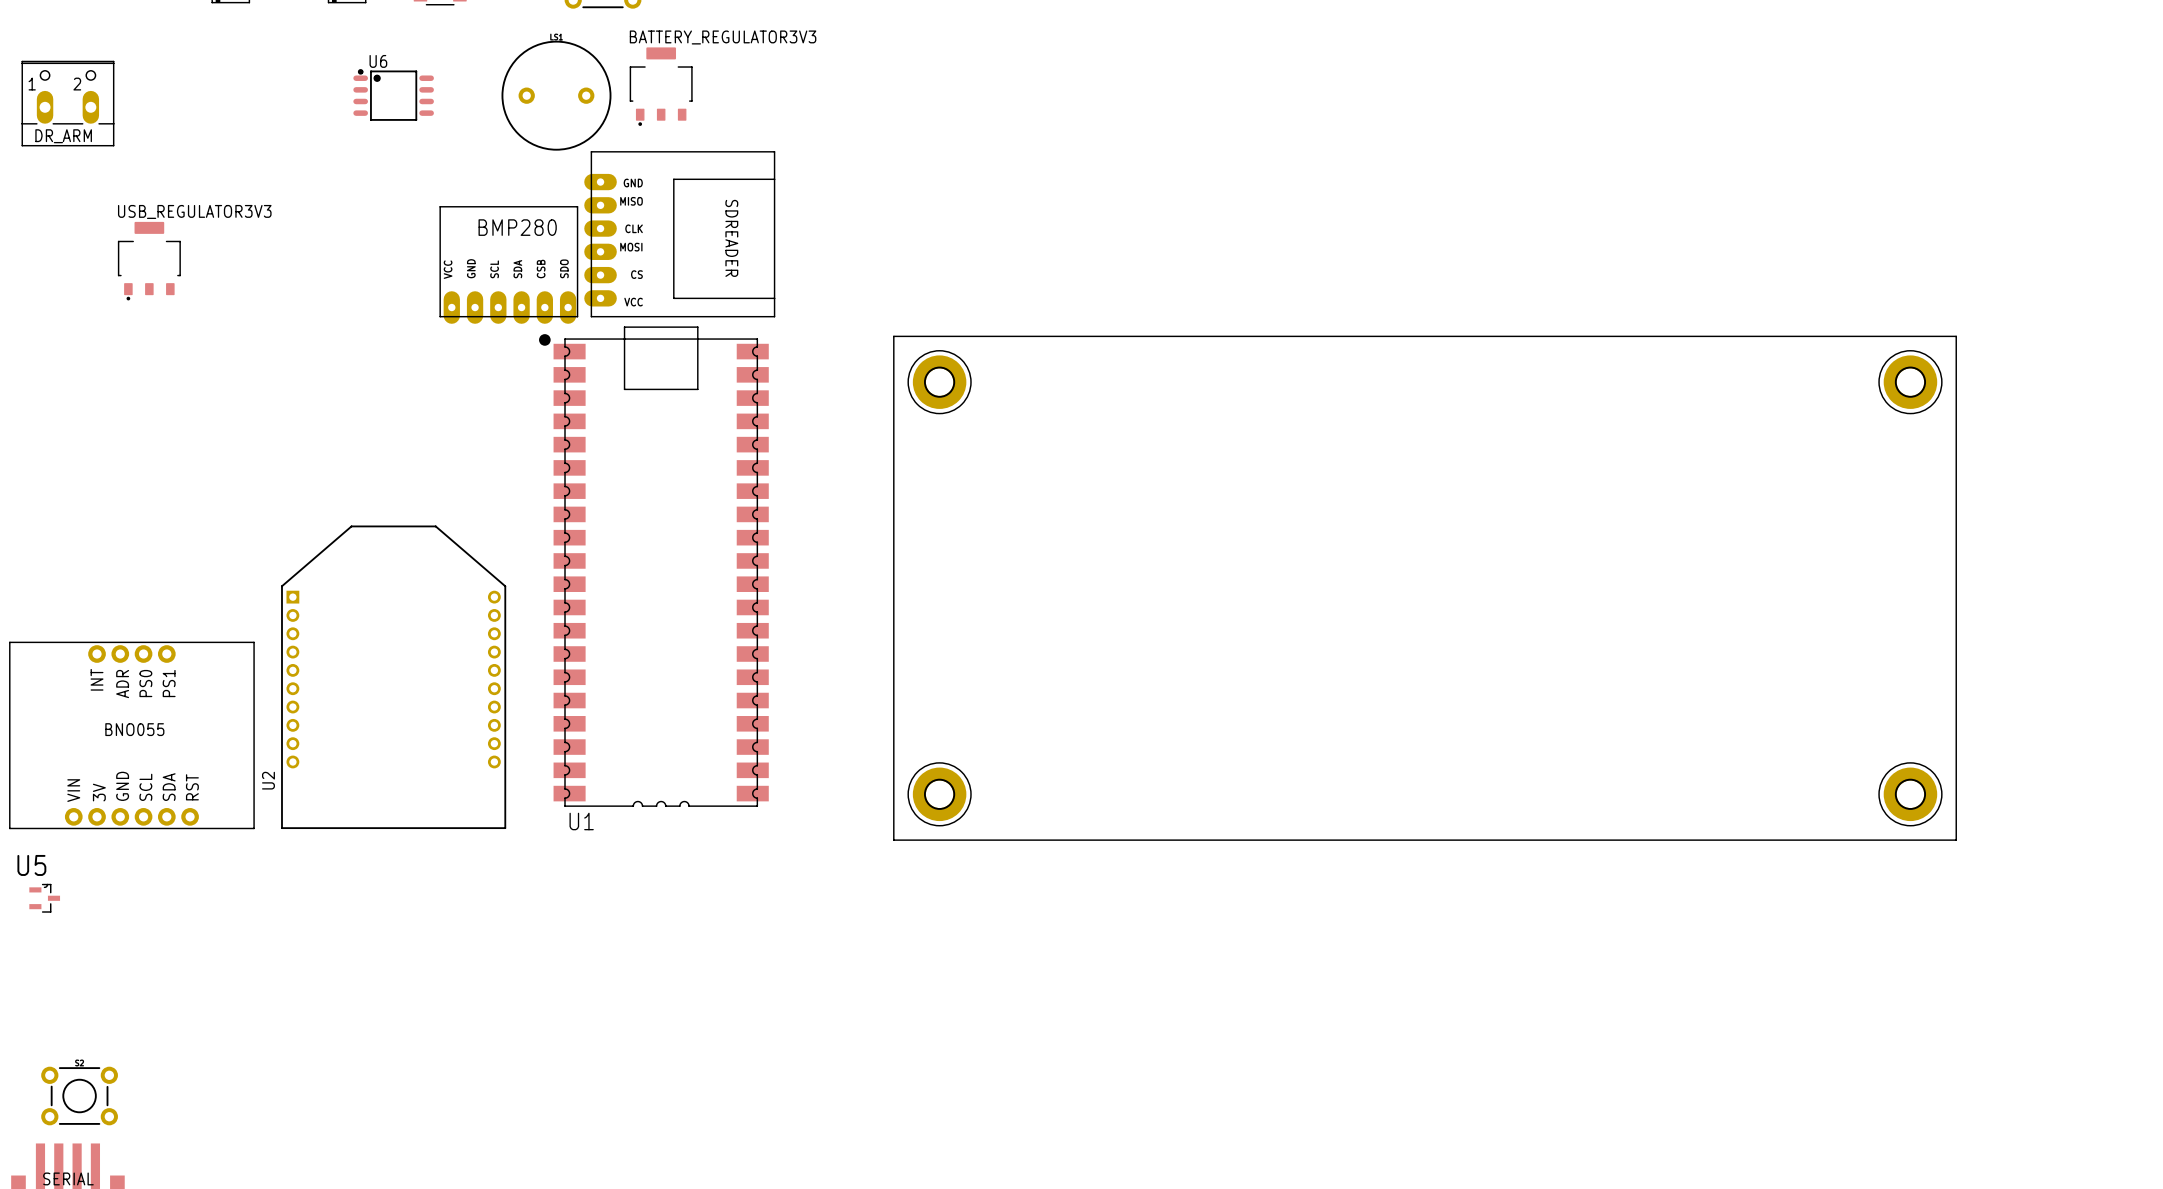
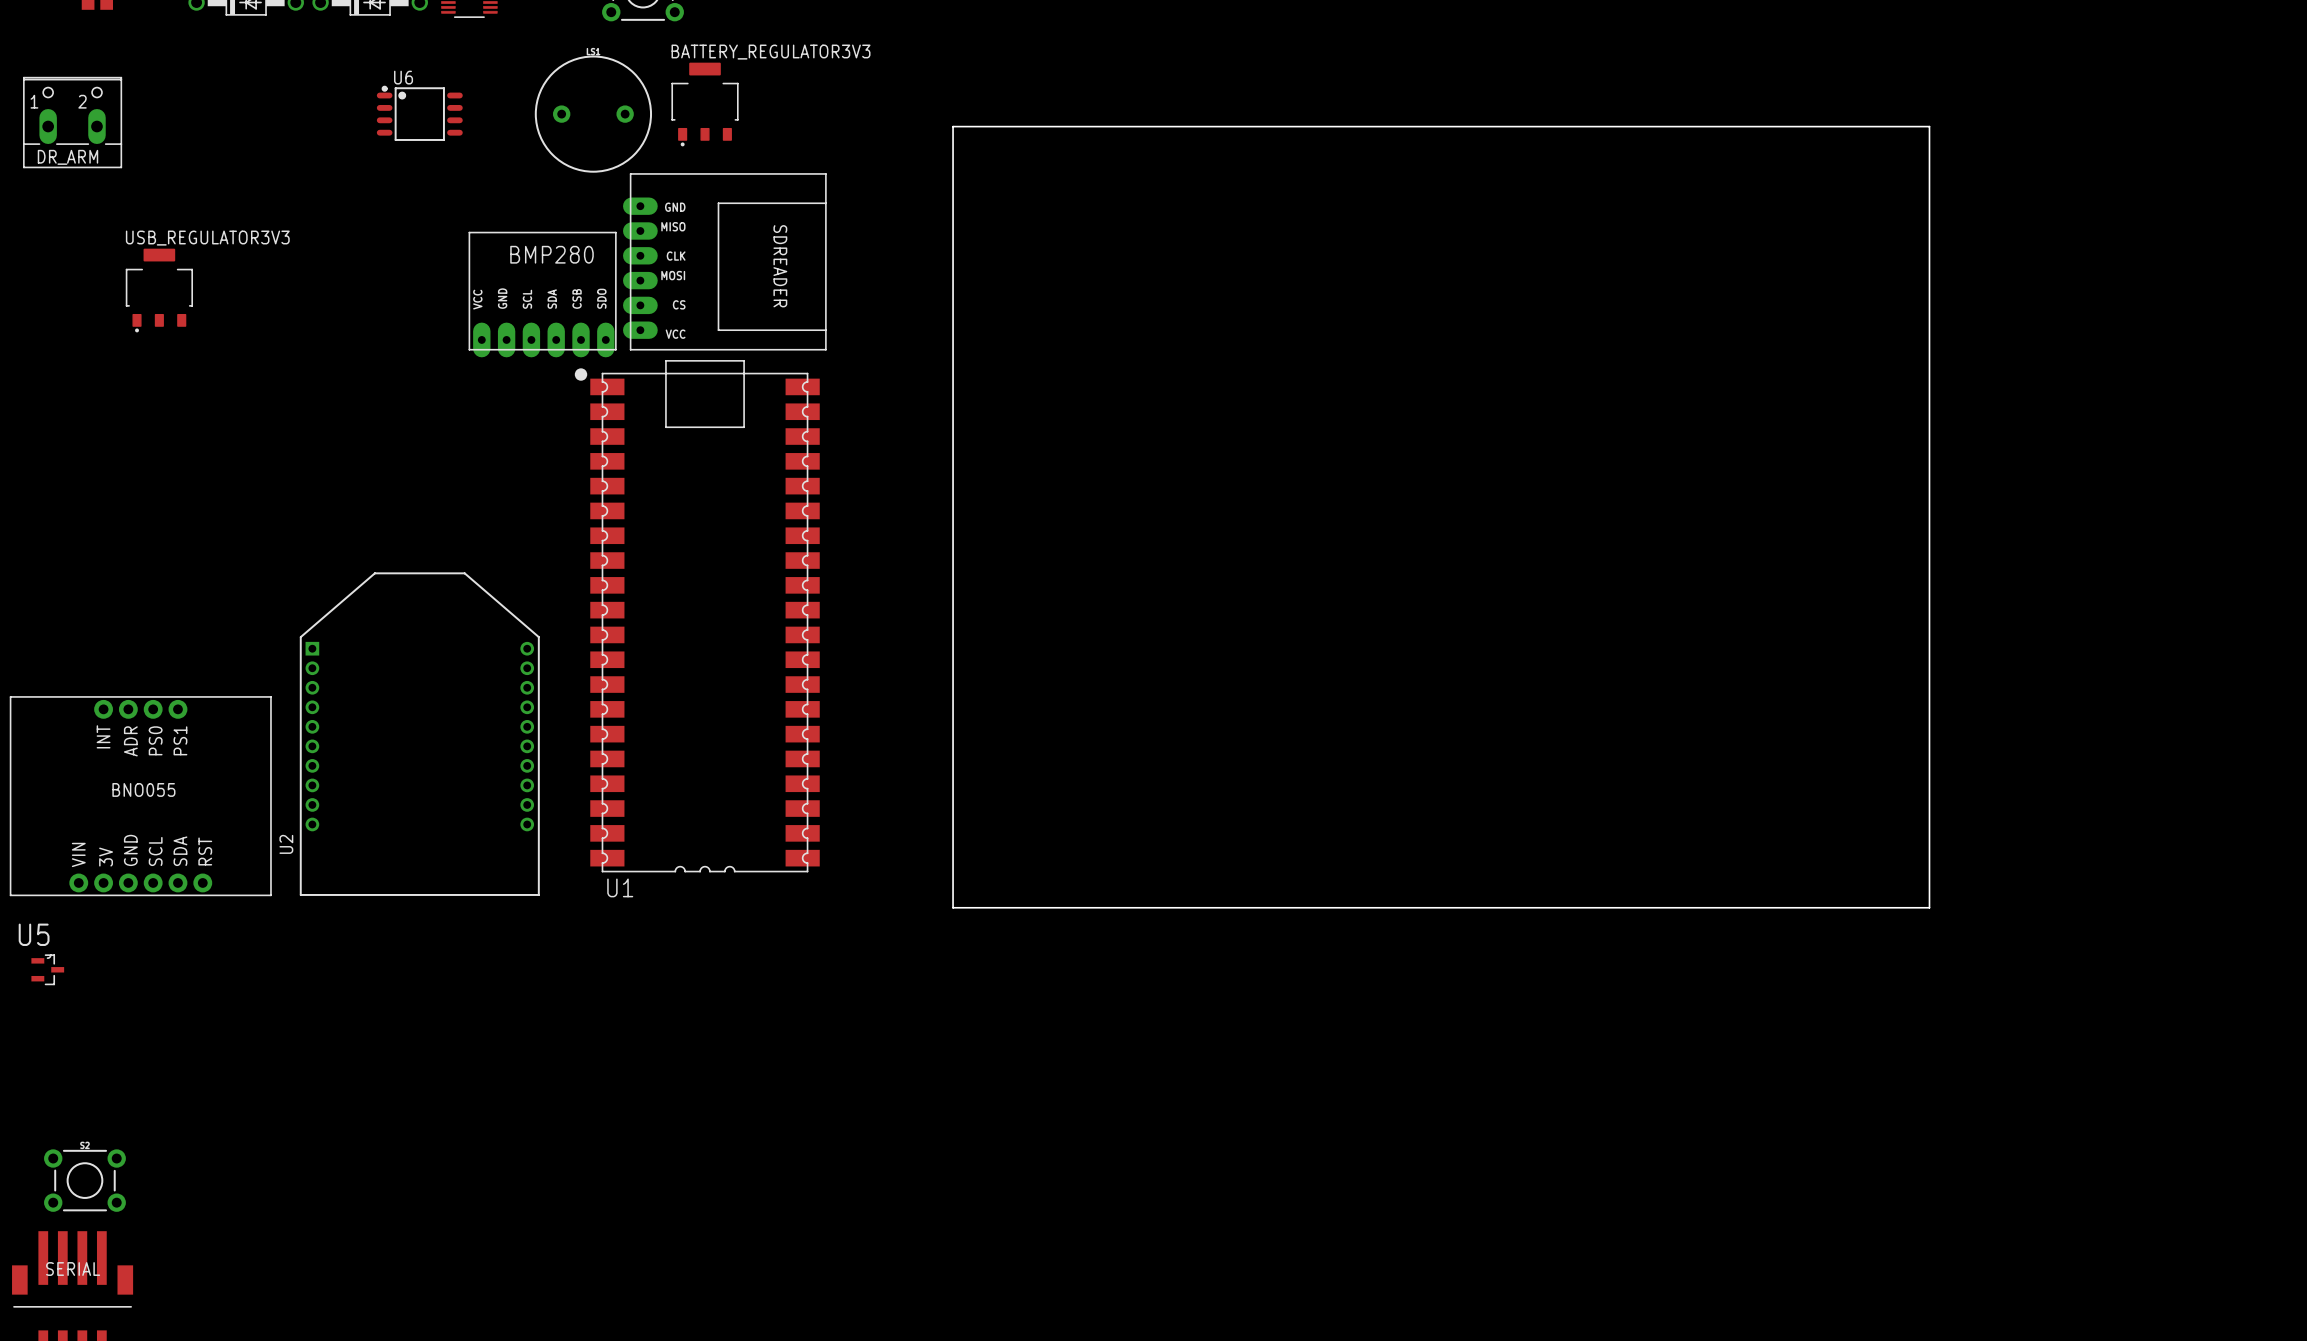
board edge: (893, 336) (1956, 336) (1956, 840) (1809, 840) -> (953, 370) (953, 126) (1929, 126) (1929, 907)
part: (939, 382) -> none
part: (1910, 382) -> none
part: (939, 794) -> none
part: (1910, 794) -> none

